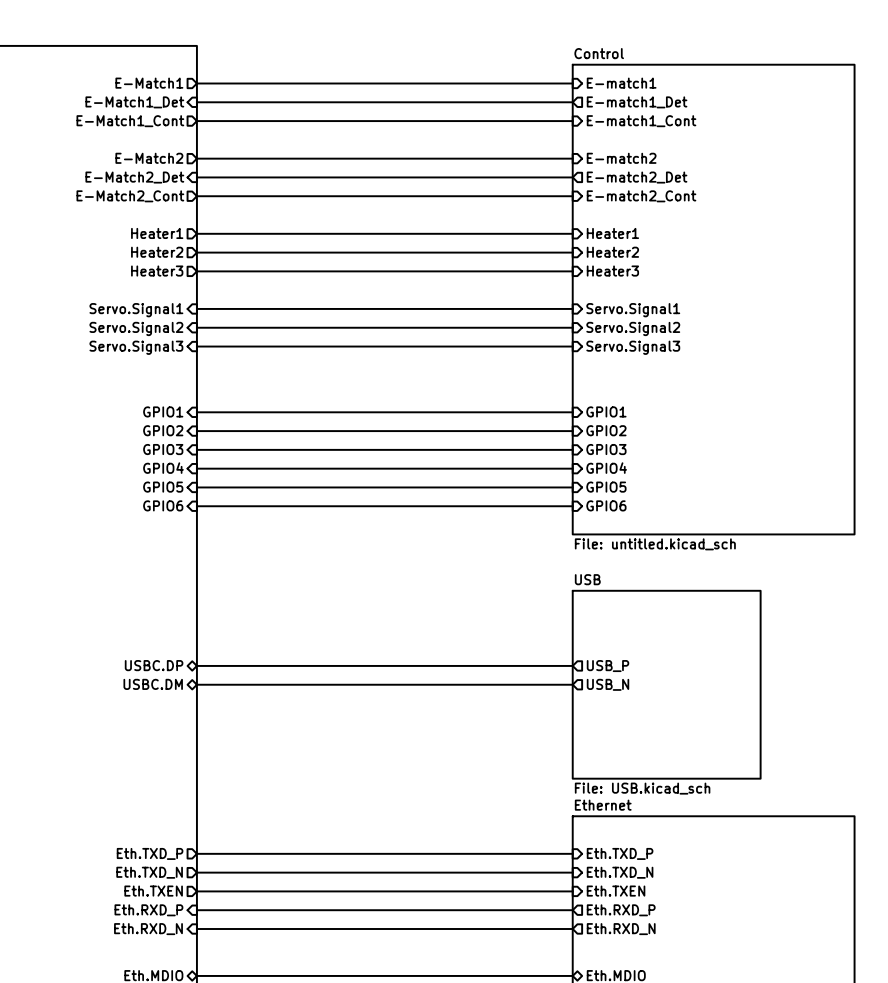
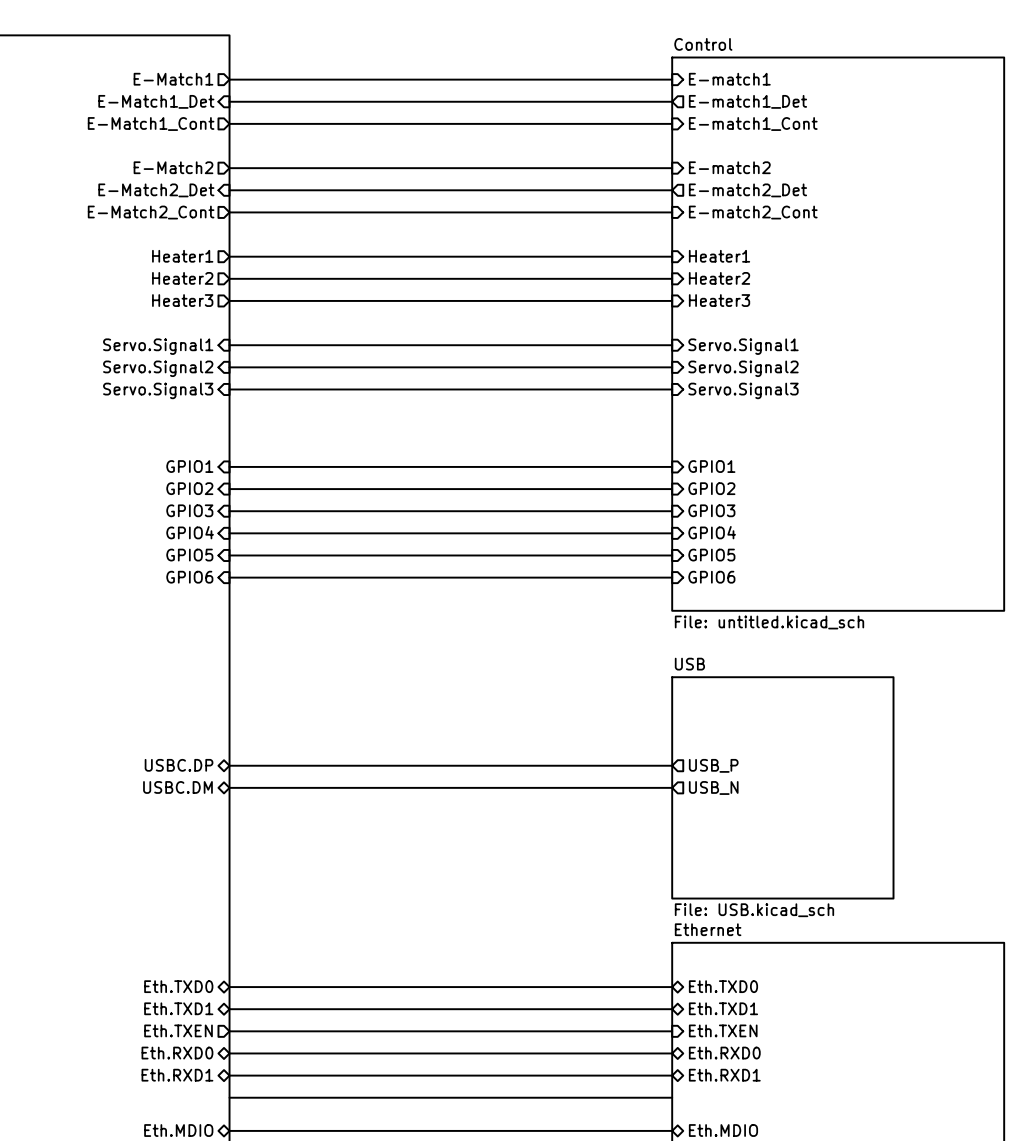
sheet pin shape: output (150, 853) -> bidirectional (178, 986)
sheet pin: Eth.TXD_P (150, 853) -> Eth.TXD0 (178, 986)
sheet pin shape: input (620, 853) -> bidirectional (723, 986)
sheet pin: Eth.TXD_P (620, 853) -> Eth.TXD0 (723, 986)
sheet pin shape: output (149, 872) -> bidirectional (178, 1008)
sheet pin: Eth.TXD_N (149, 872) -> Eth.TXD1 (178, 1008)
sheet pin shape: input (620, 872) -> bidirectional (723, 1008)
sheet pin: Eth.TXD_N (620, 872) -> Eth.TXD1 (723, 1008)
sheet pin shape: input (148, 910) -> bidirectional (177, 1053)
sheet pin: Eth.RXD_P (148, 910) -> Eth.RXD0 (177, 1053)
sheet pin shape: output (621, 910) -> bidirectional (724, 1053)
sheet pin: Eth.RXD_P (621, 910) -> Eth.RXD0 (724, 1053)
sheet pin shape: input (148, 929) -> bidirectional (177, 1075)
sheet pin: Eth.RXD_N (148, 929) -> Eth.RXD1 (177, 1075)
sheet pin shape: output (621, 929) -> bidirectional (724, 1075)
sheet pin: Eth.RXD_N (621, 929) -> Eth.RXD1 (724, 1075)
wire: none -> (229, 1097) (672, 1097)

